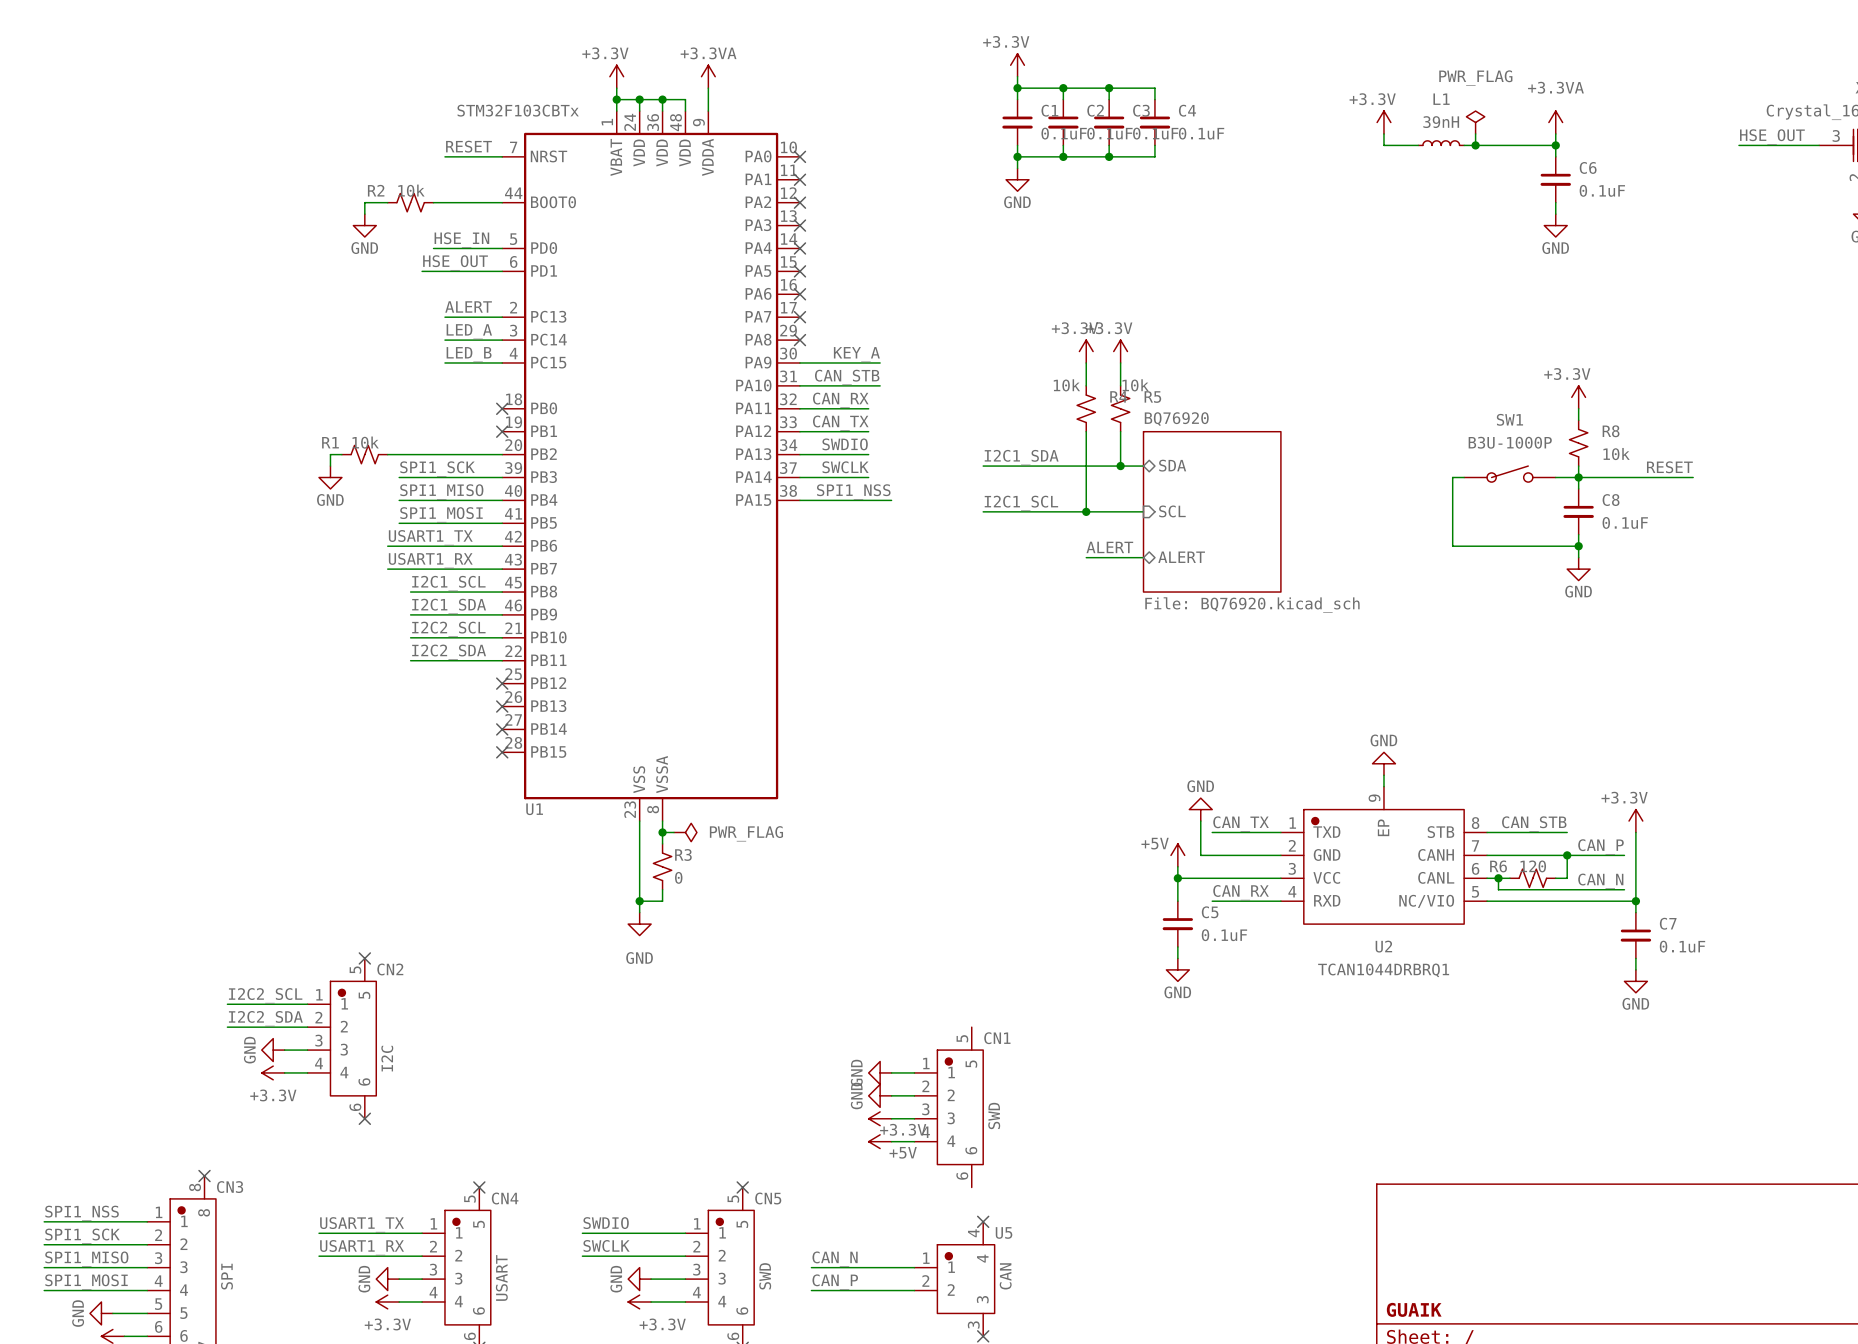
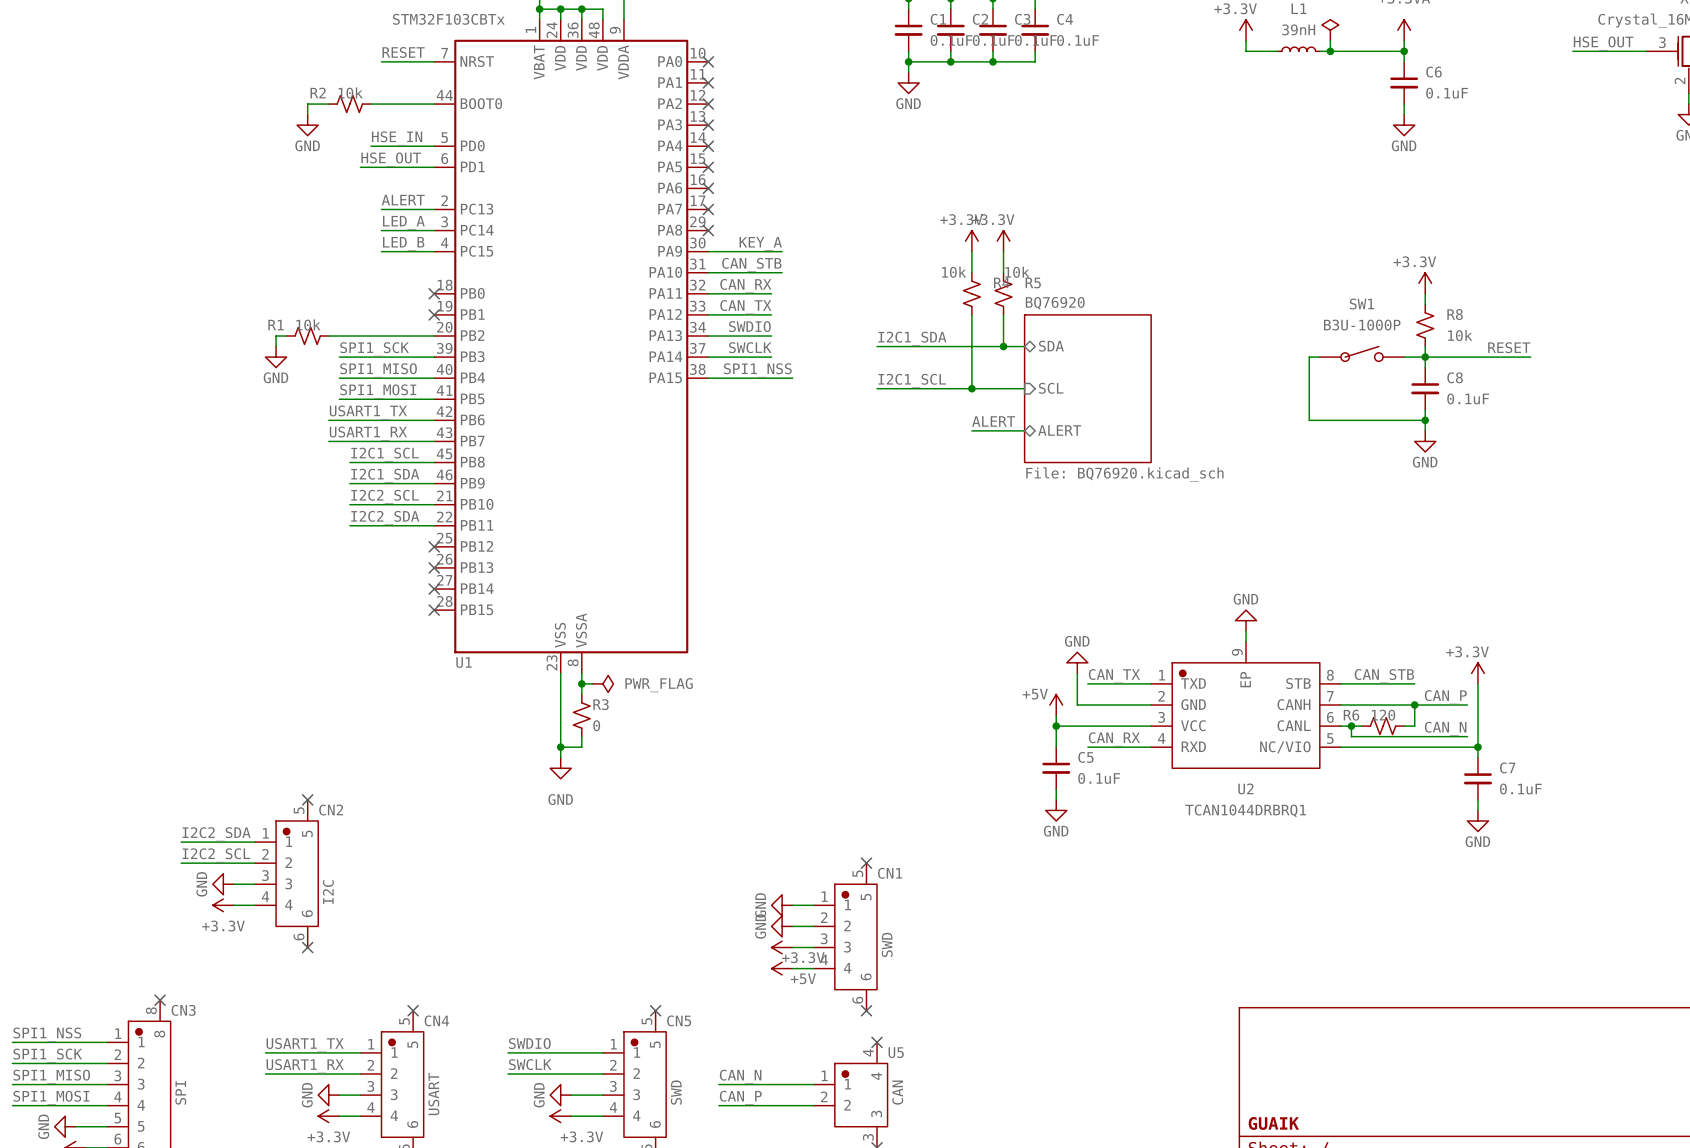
label: I2C2_SCL (265, 995) -> I2C2_SDA (216, 834)
label: I2C2_SDA (265, 1018) -> I2C2_SCL (216, 855)
no-connect mark: none -> (866, 863)
no-connect mark: none -> (866, 1010)

